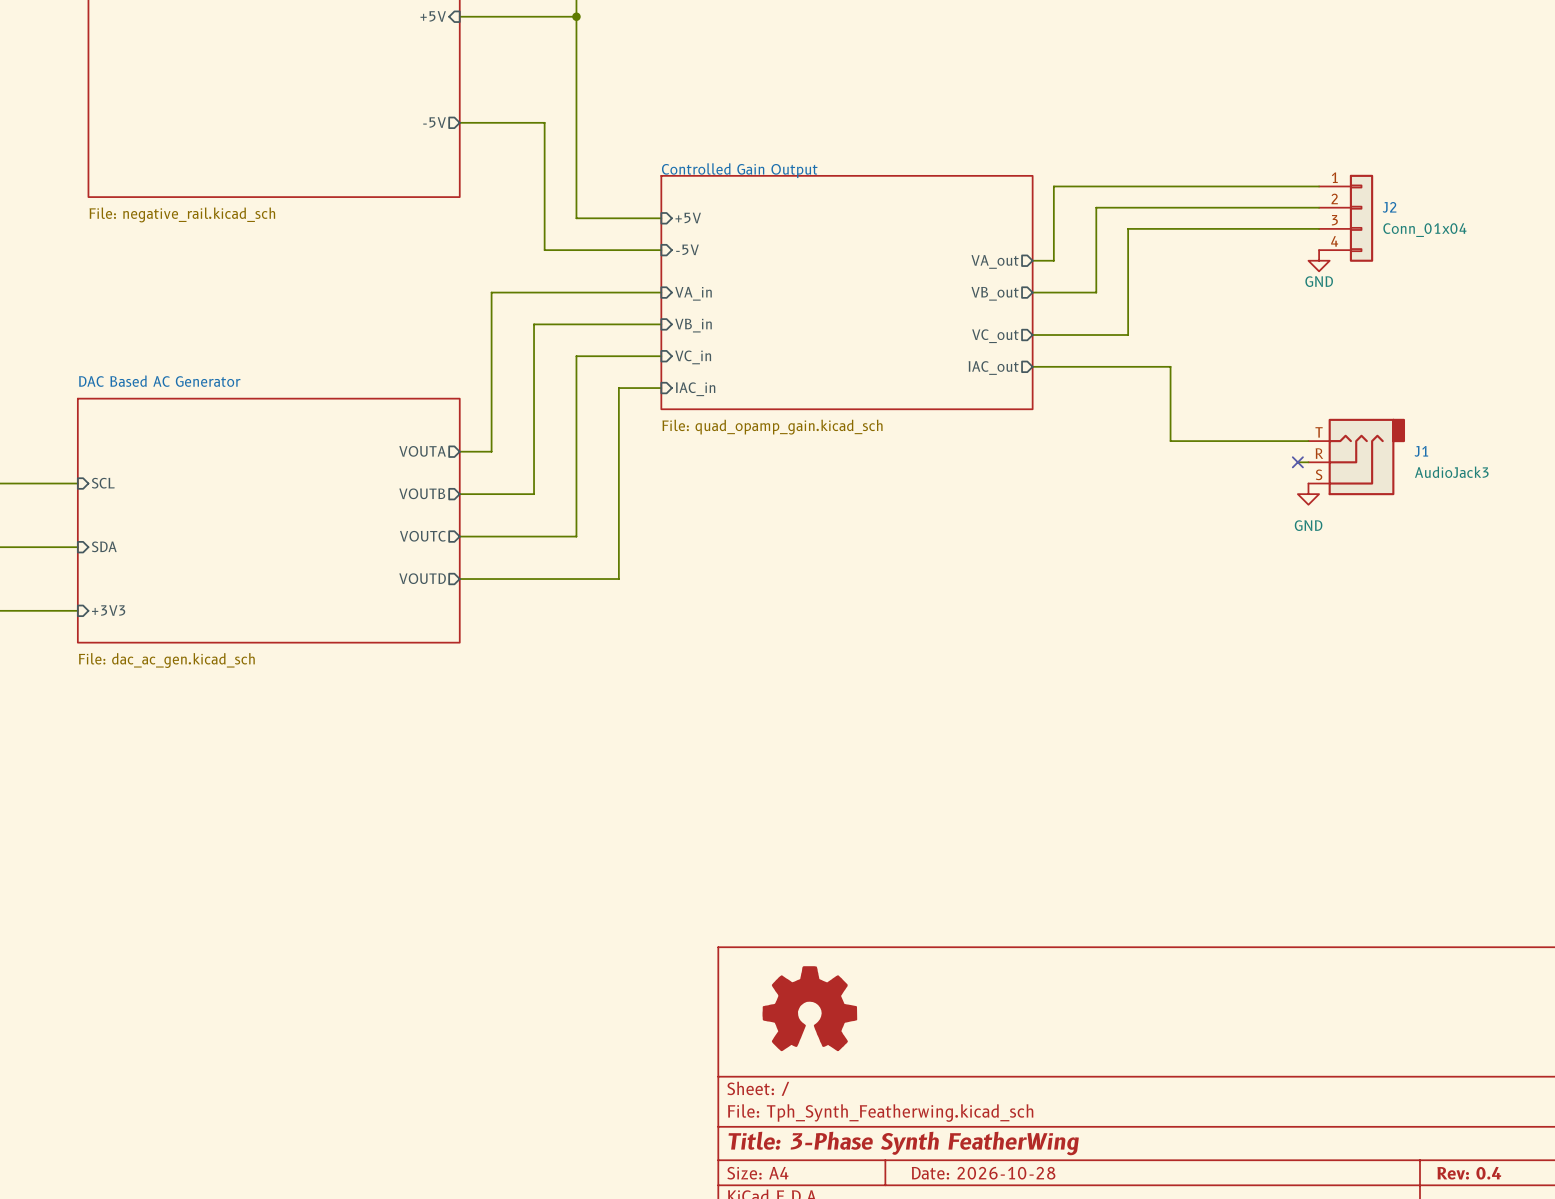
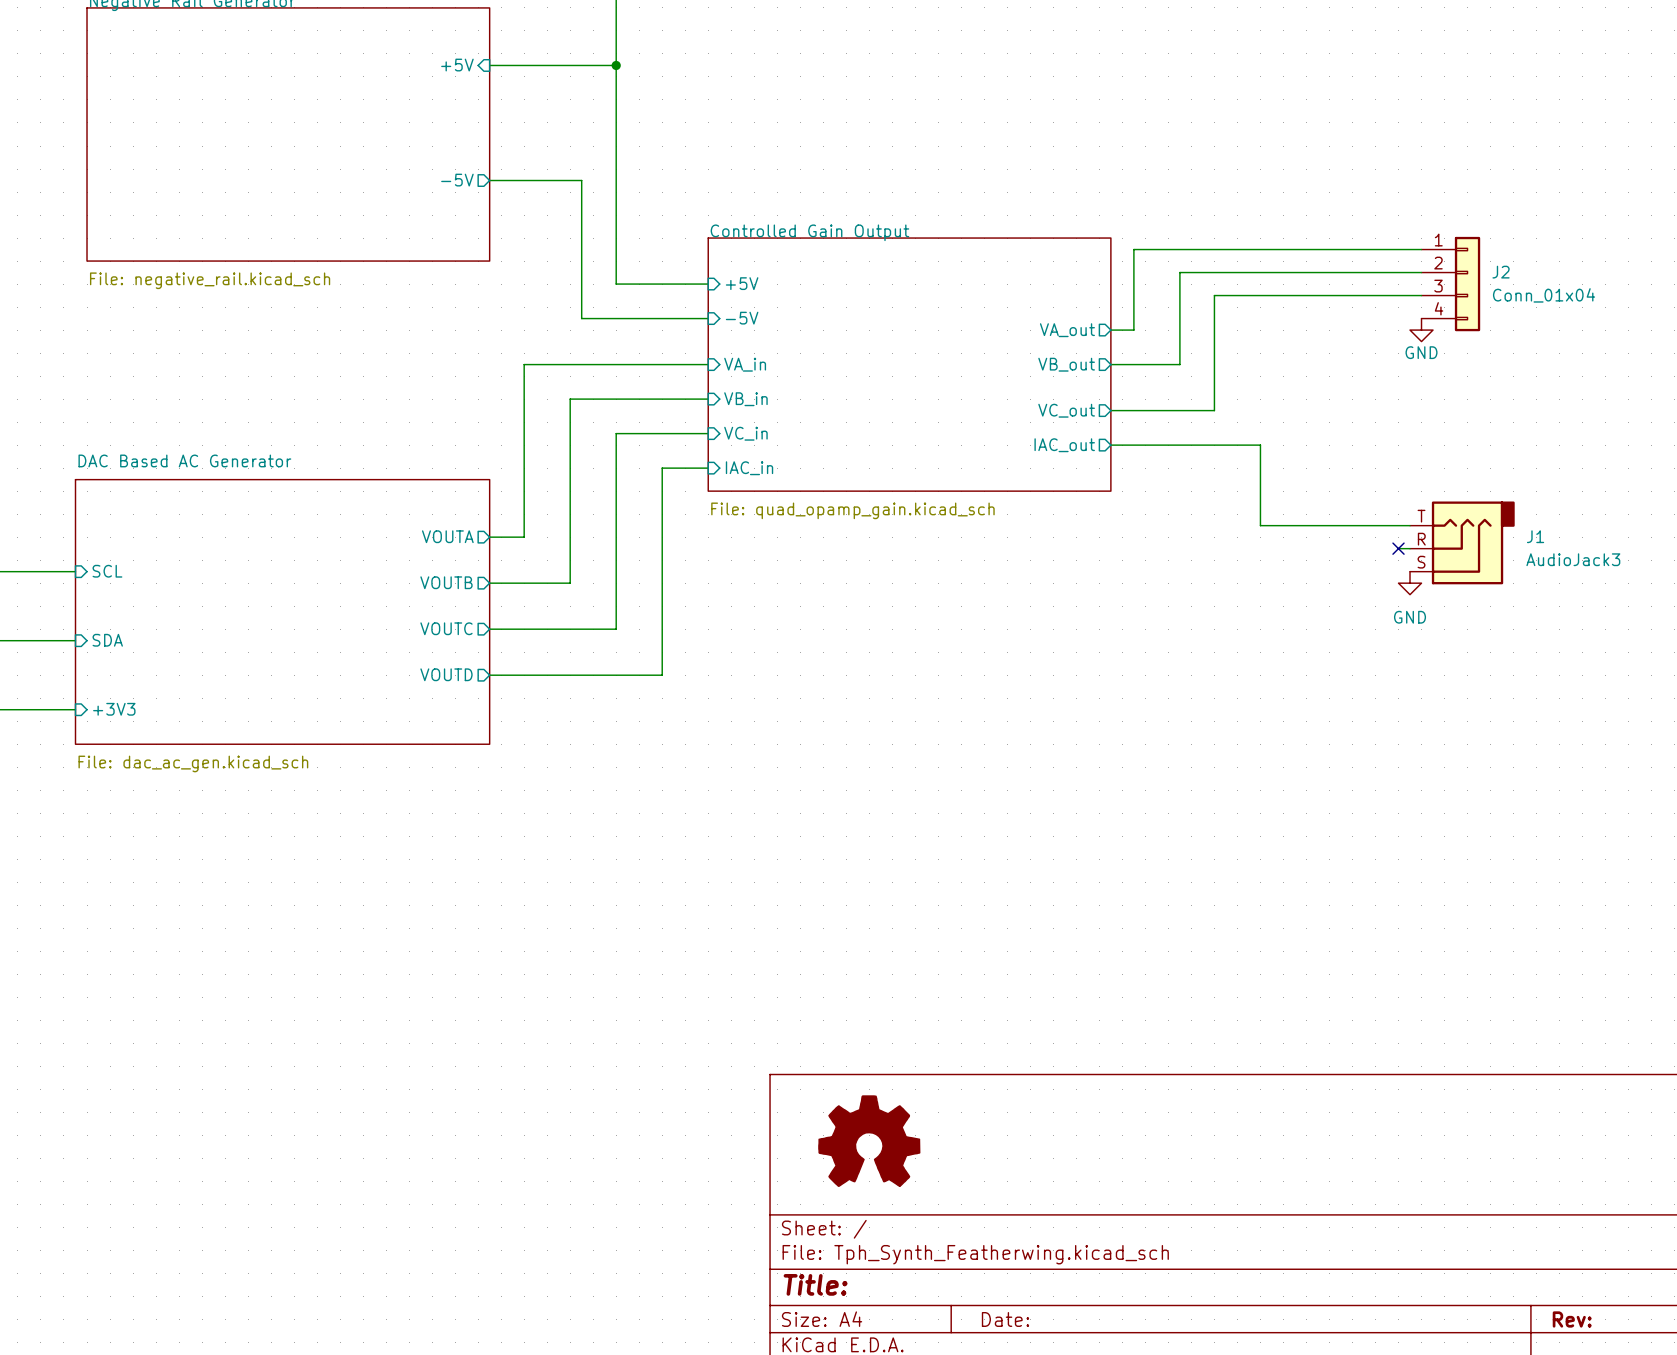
title block: Title: 3-Phase Synth FeatherWing (903, 1143) -> Title: (815, 1284)
title block: Date: 2026-10-28 (983, 1173) -> Date: (1005, 1319)
title block: Rev: 0.4 (1469, 1173) -> Rev: (1572, 1319)

